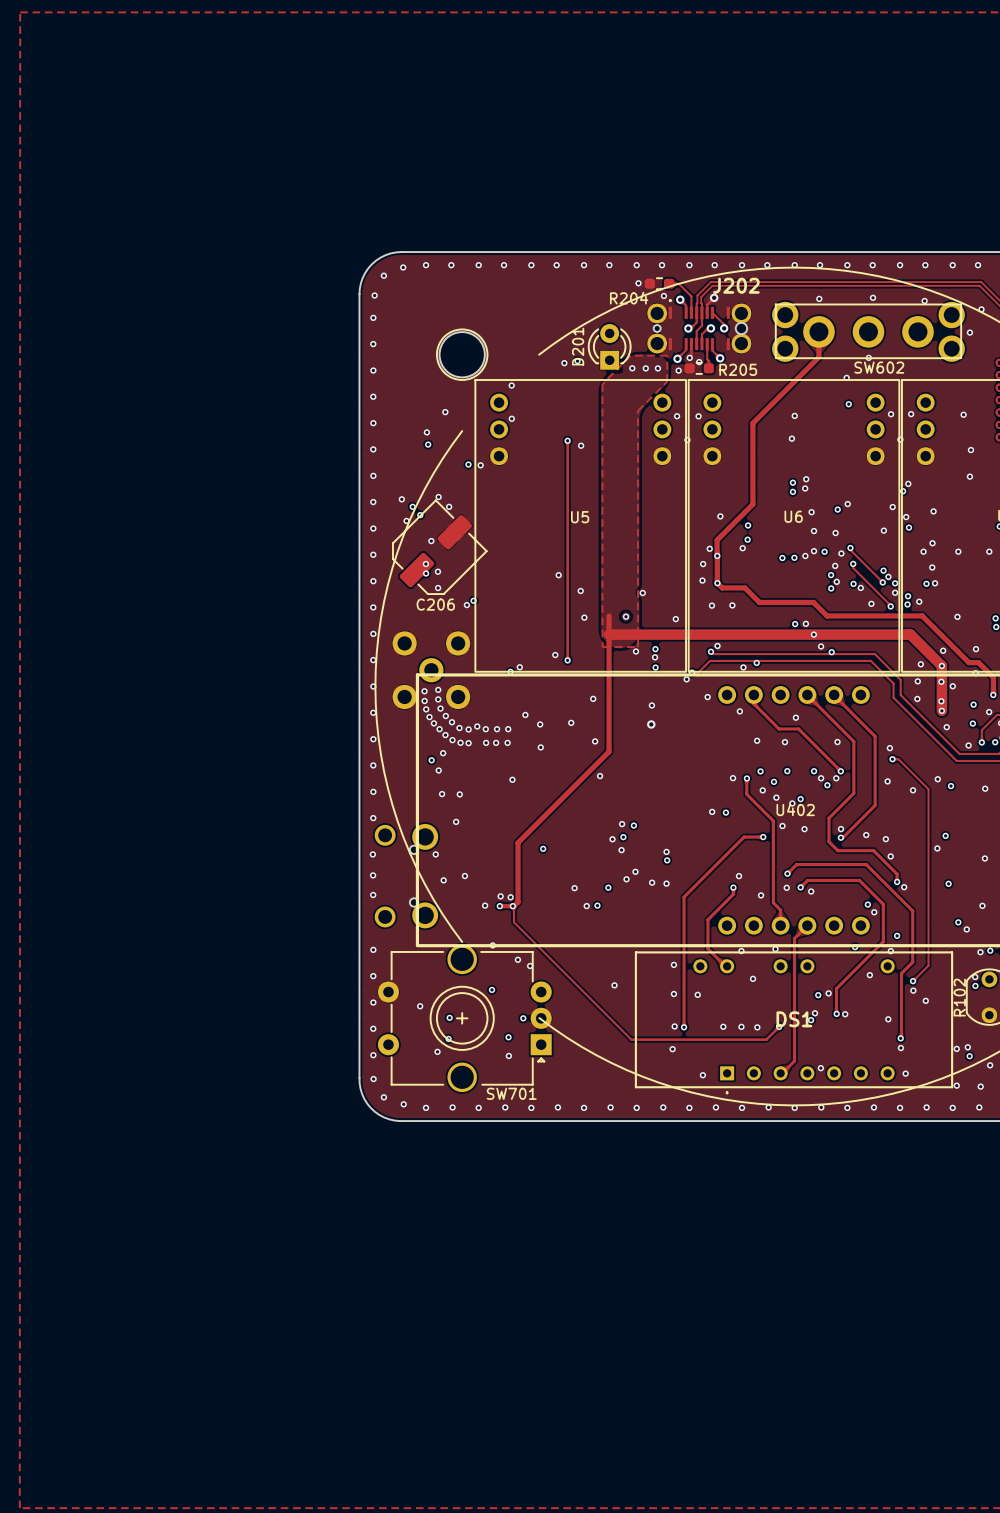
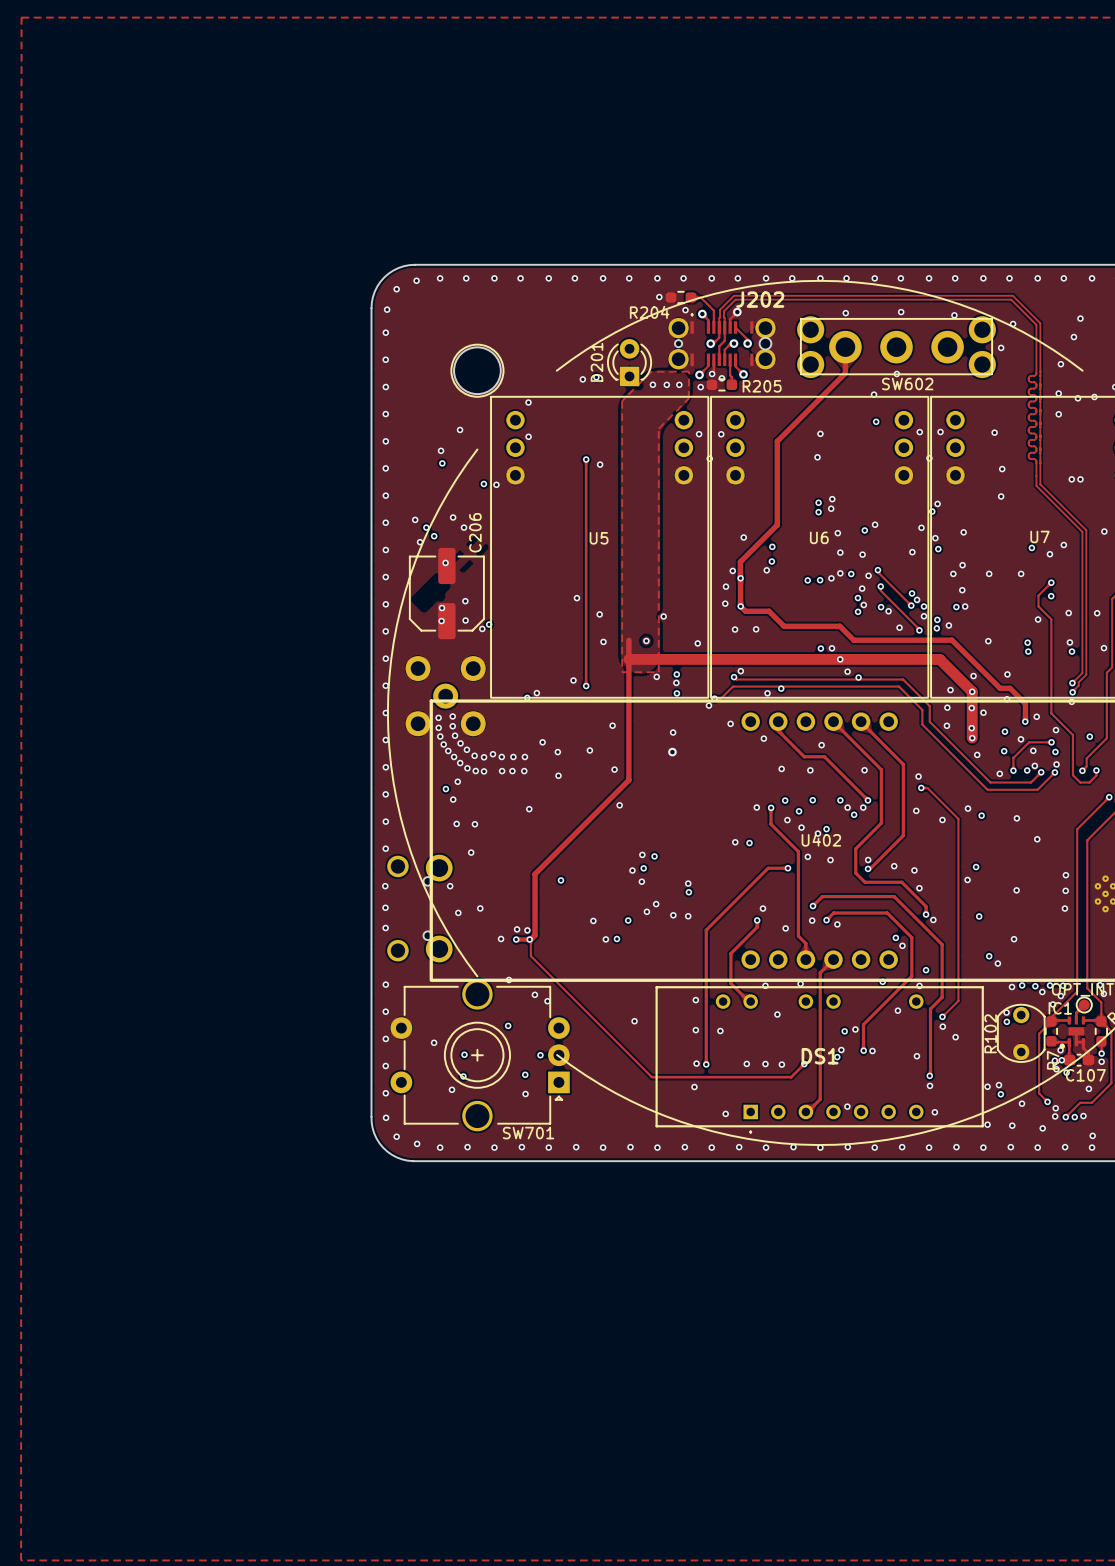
C206 rotation: 0° (439, 547) -> 45° counterclockwise (446, 593)
via: (425, 564) -> none
via: (437, 571) -> none
via: (426, 573) -> none
via: none -> (465, 601)
via: none -> (442, 608)
via: (438, 588) -> none
via: none -> (465, 620)
via: none -> (441, 621)
C206 name position: C206 (435, 604) -> C206 (475, 532)

